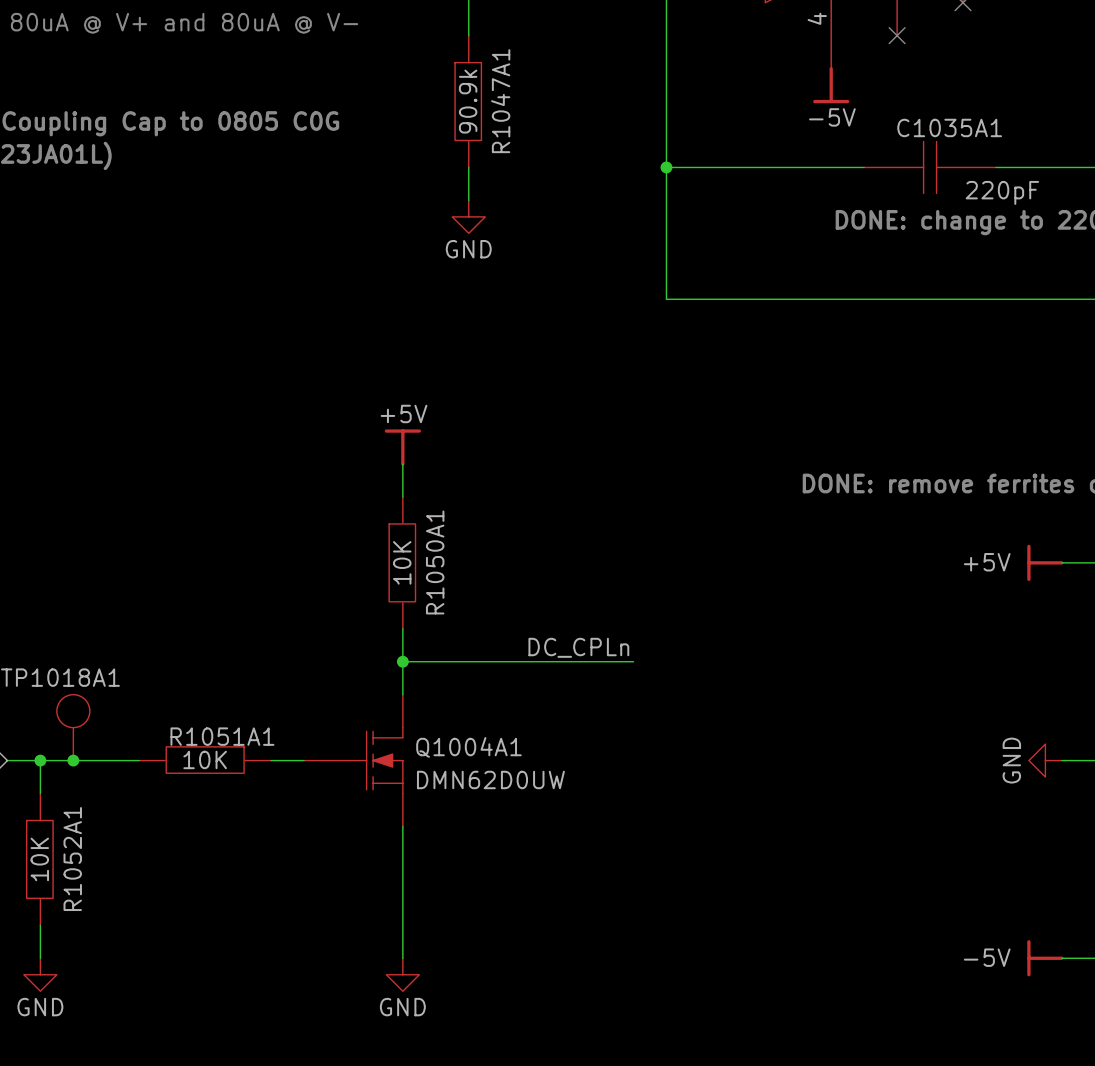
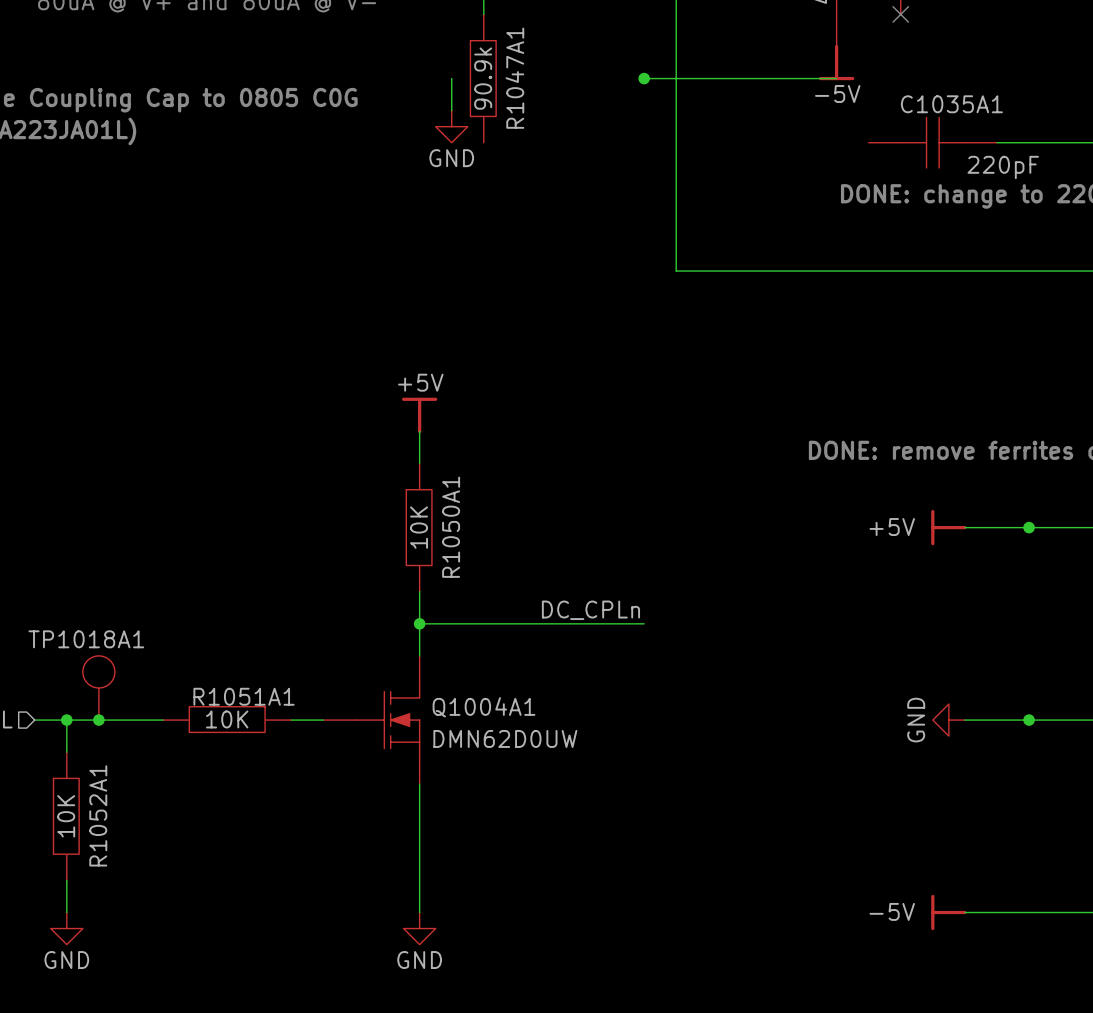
wire: (468, 167) (468, 200) -> (451, 78) (451, 110)
wire: (666, 167) (864, 167) -> (644, 78) (836, 78)
junction position: (666, 167) -> (644, 78)
power symbol position: GND (468, 216) -> GND (451, 126)
wire: none -> (964, 527) (1061, 527)
junction: none -> (1029, 527)
power symbol position: +5V (1045, 562) -> +5V (948, 527)
wire: none -> (964, 720) (1061, 720)
junction: none -> (1029, 720)
power symbol position: GND (1045, 760) -> GND (948, 720)
wire: none -> (964, 912) (1061, 912)
power symbol position: -5V (1045, 958) -> -5V (948, 912)

